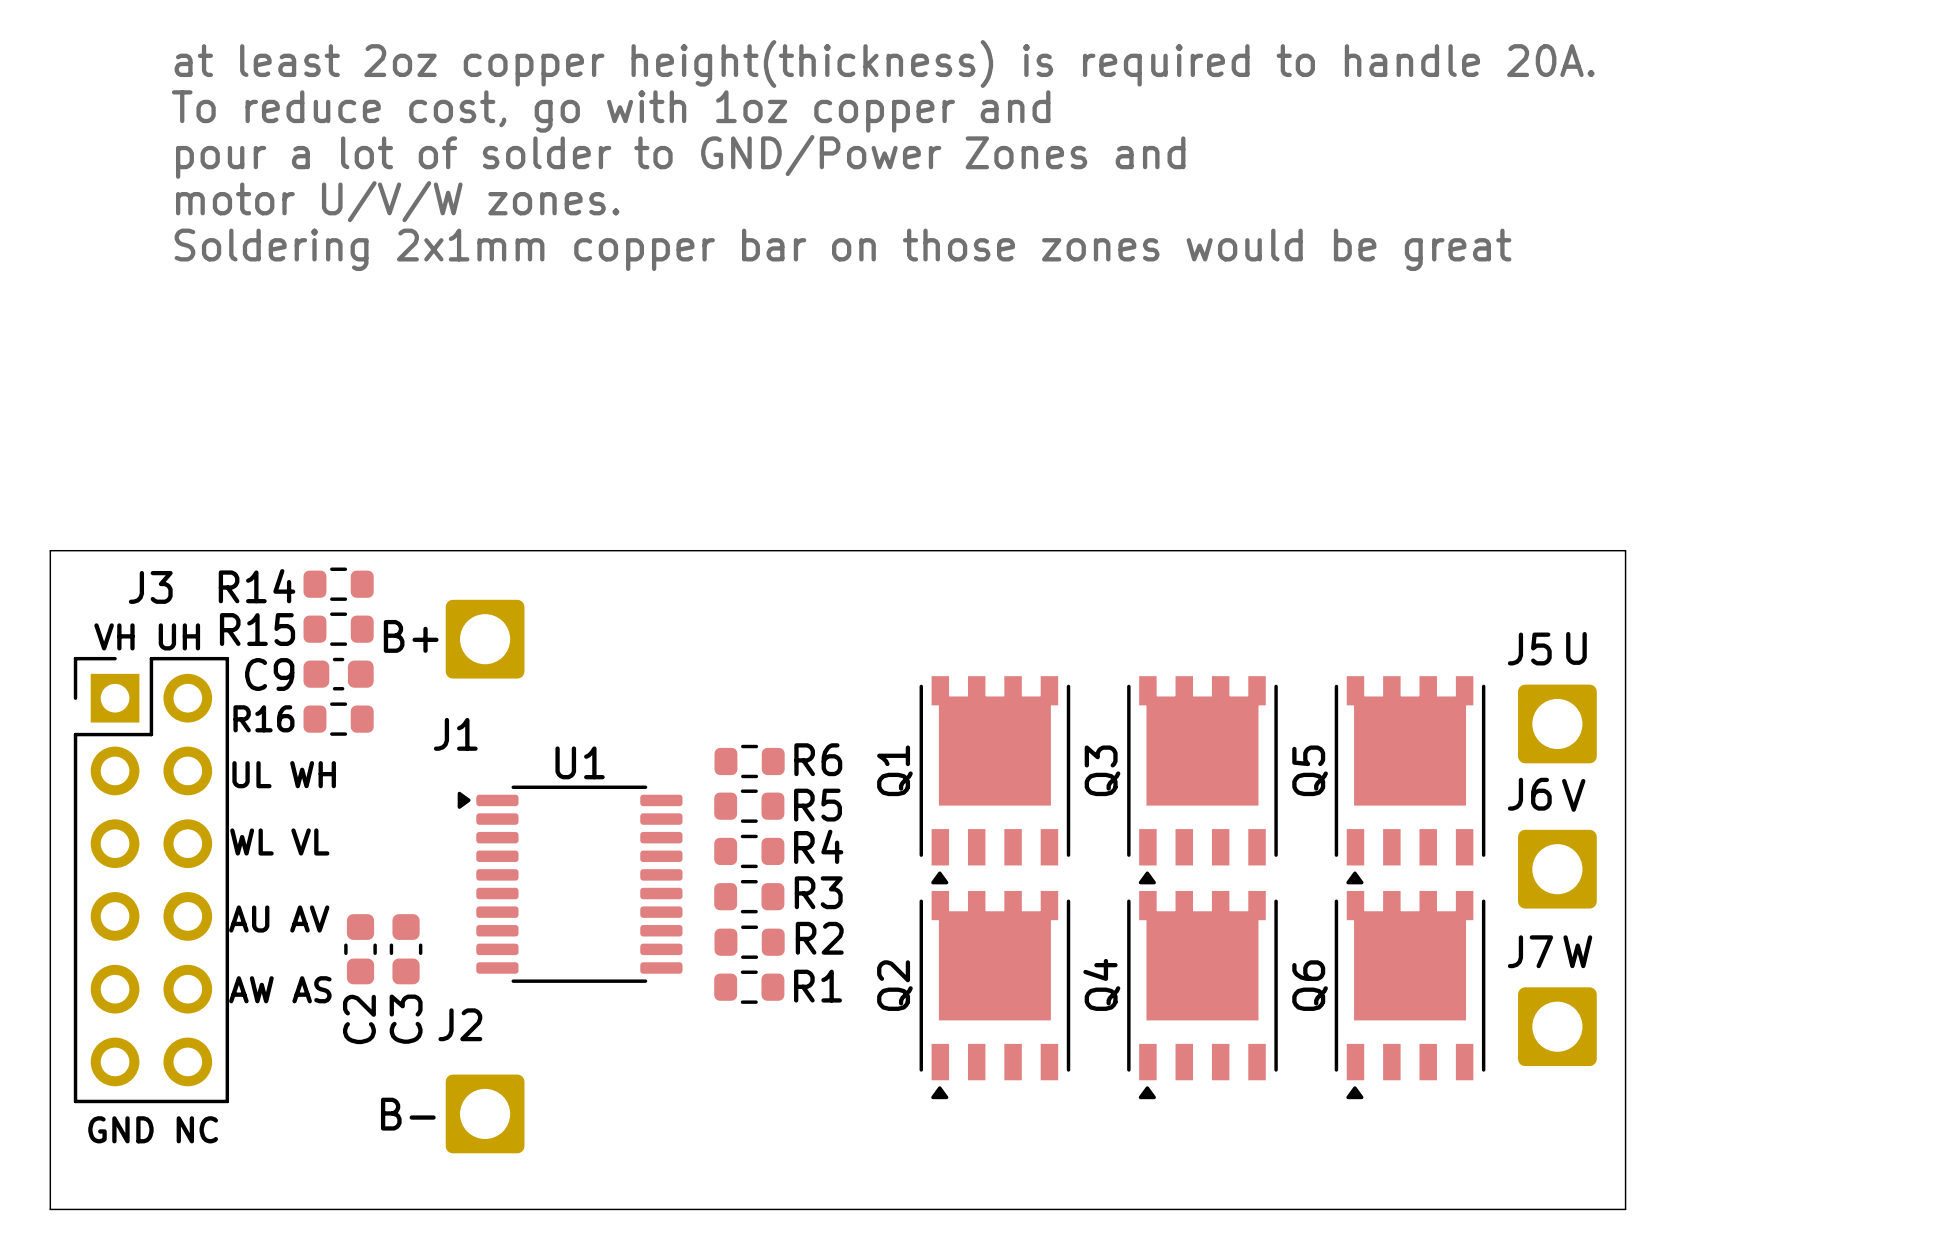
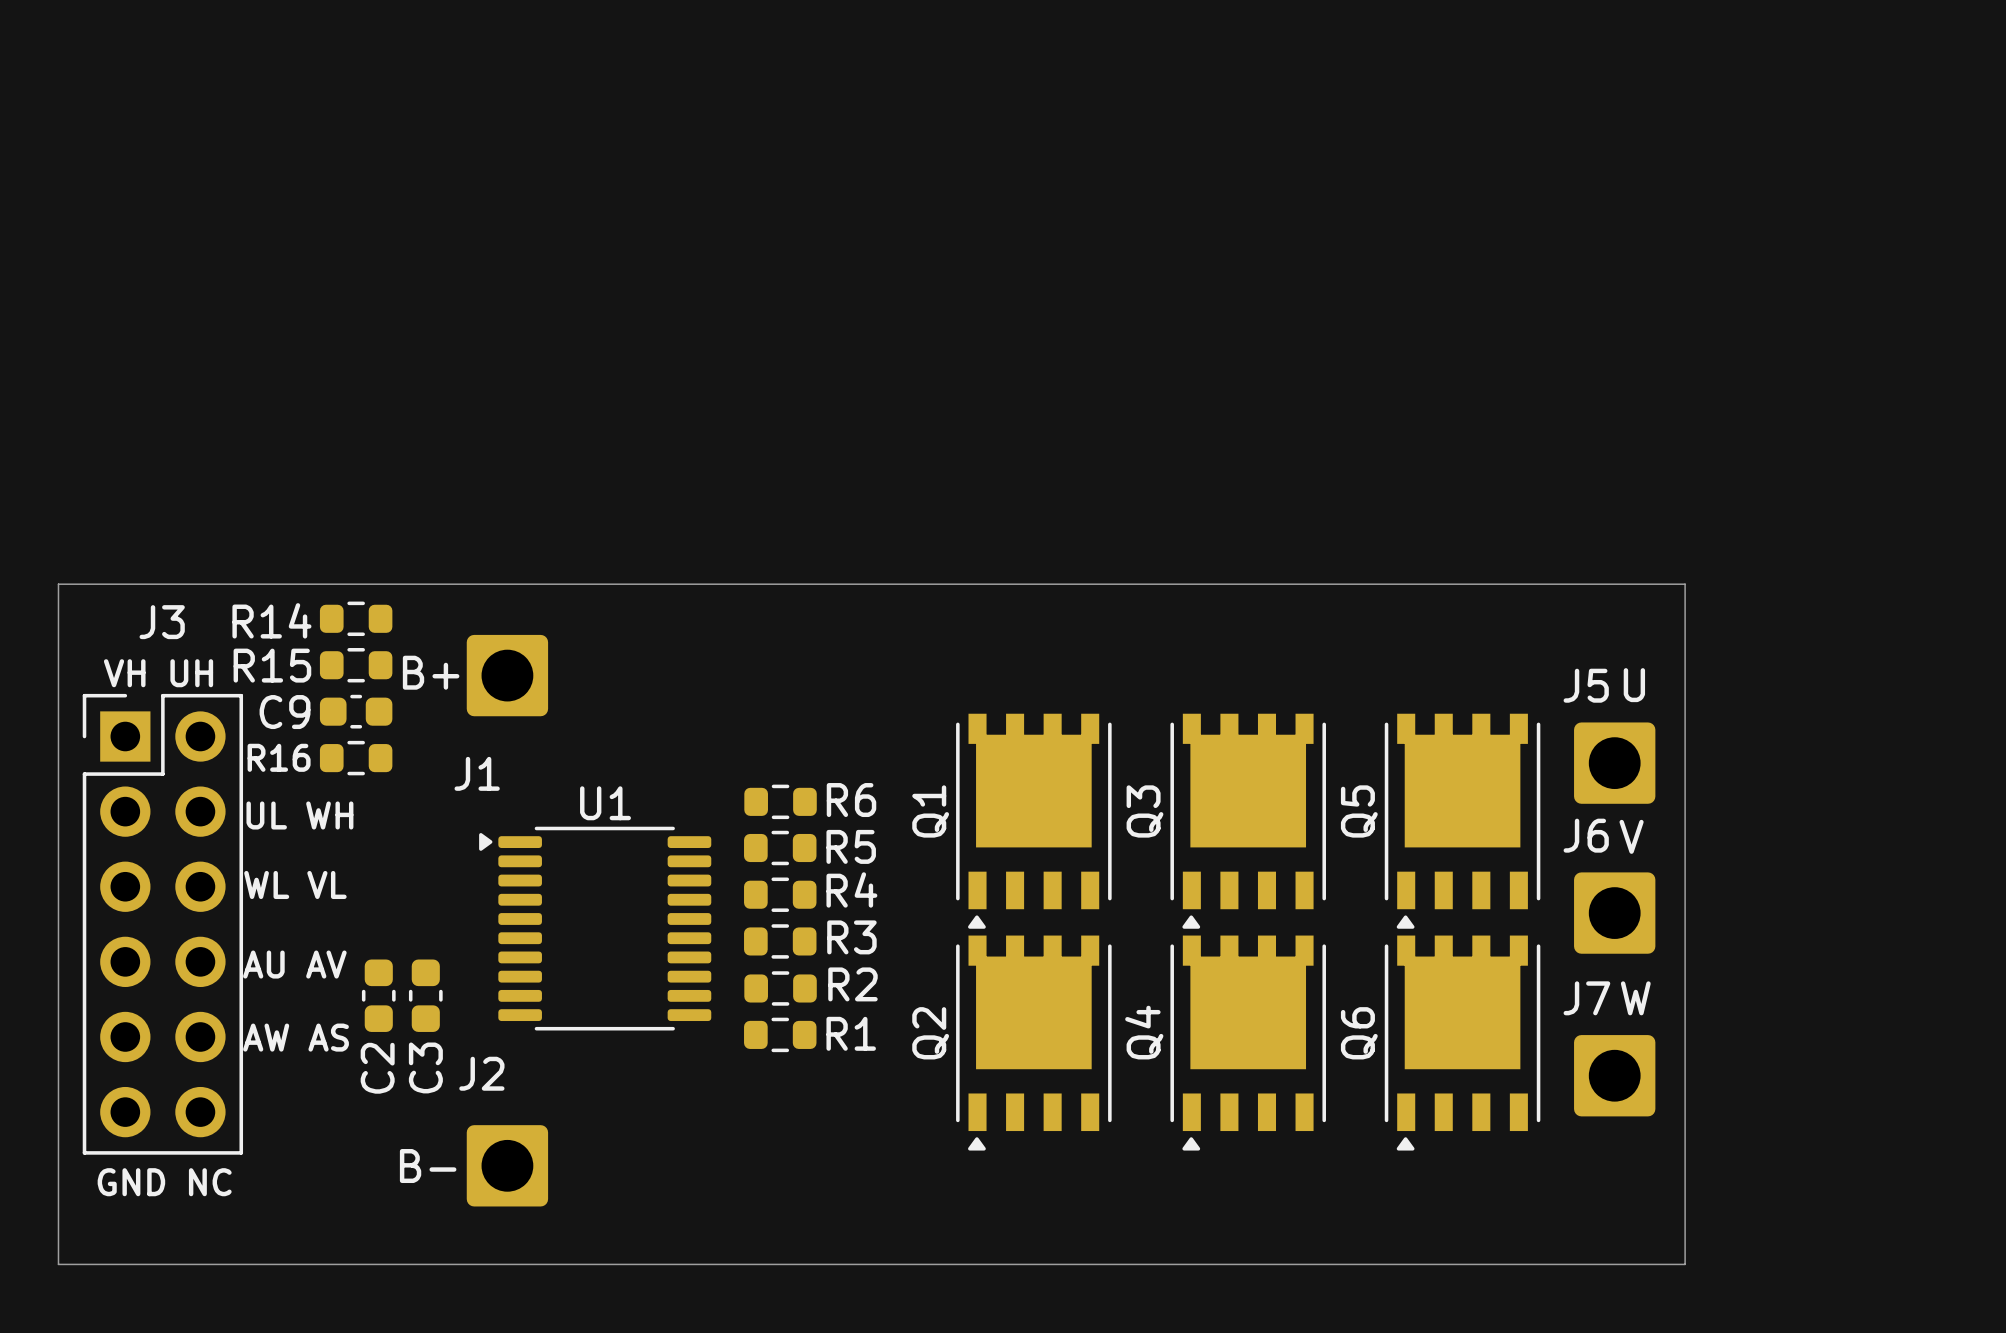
text: at least 2oz copper height(thickness) is required to handle 20A. (884, 63) -> none
text: To reduce cost, go with 1oz copper and (611, 111) -> none
text: pour a lot of solder to GND/Power Zones and (680, 156) -> none
text: motor U/V/W zones. (397, 201) -> none
text: Soldering 2x1mm copper bar on those zones would be great (843, 249) -> none

